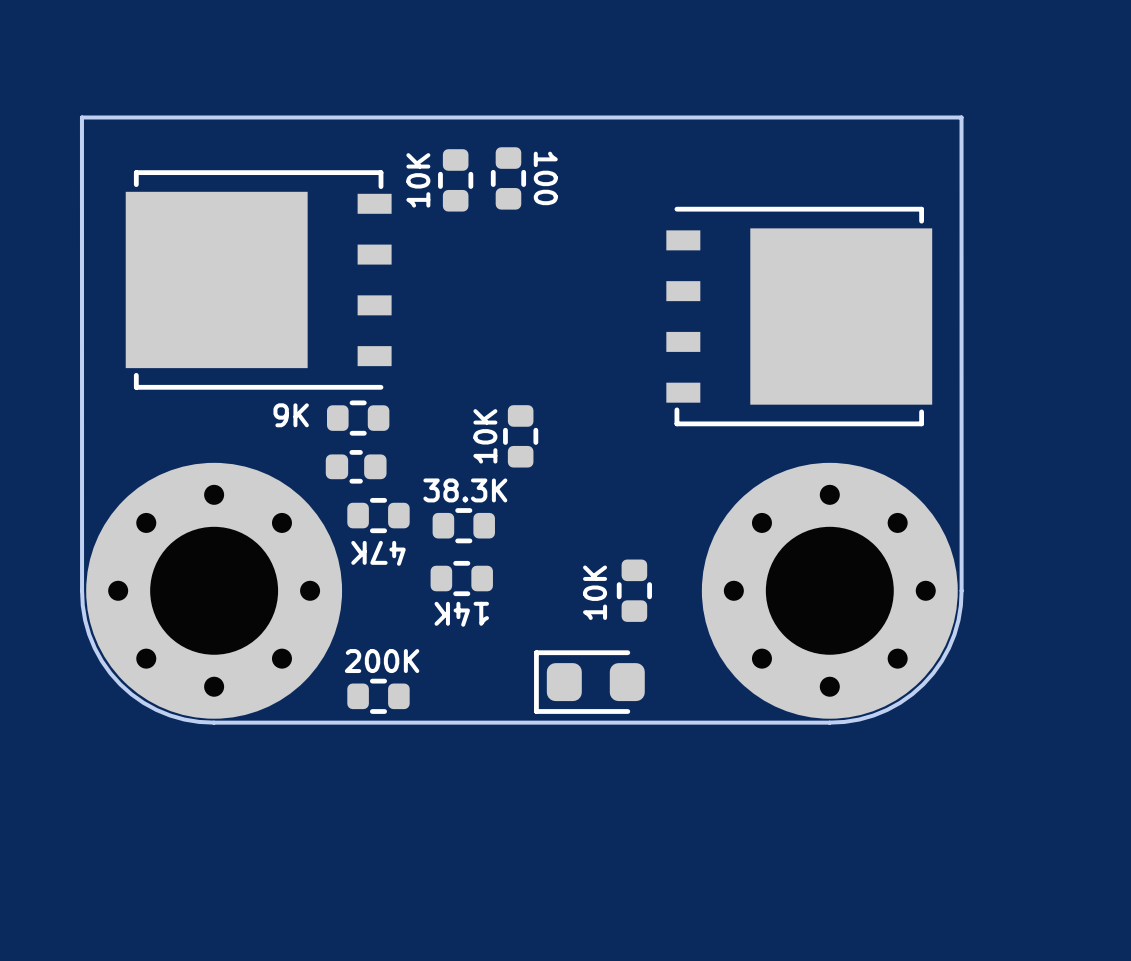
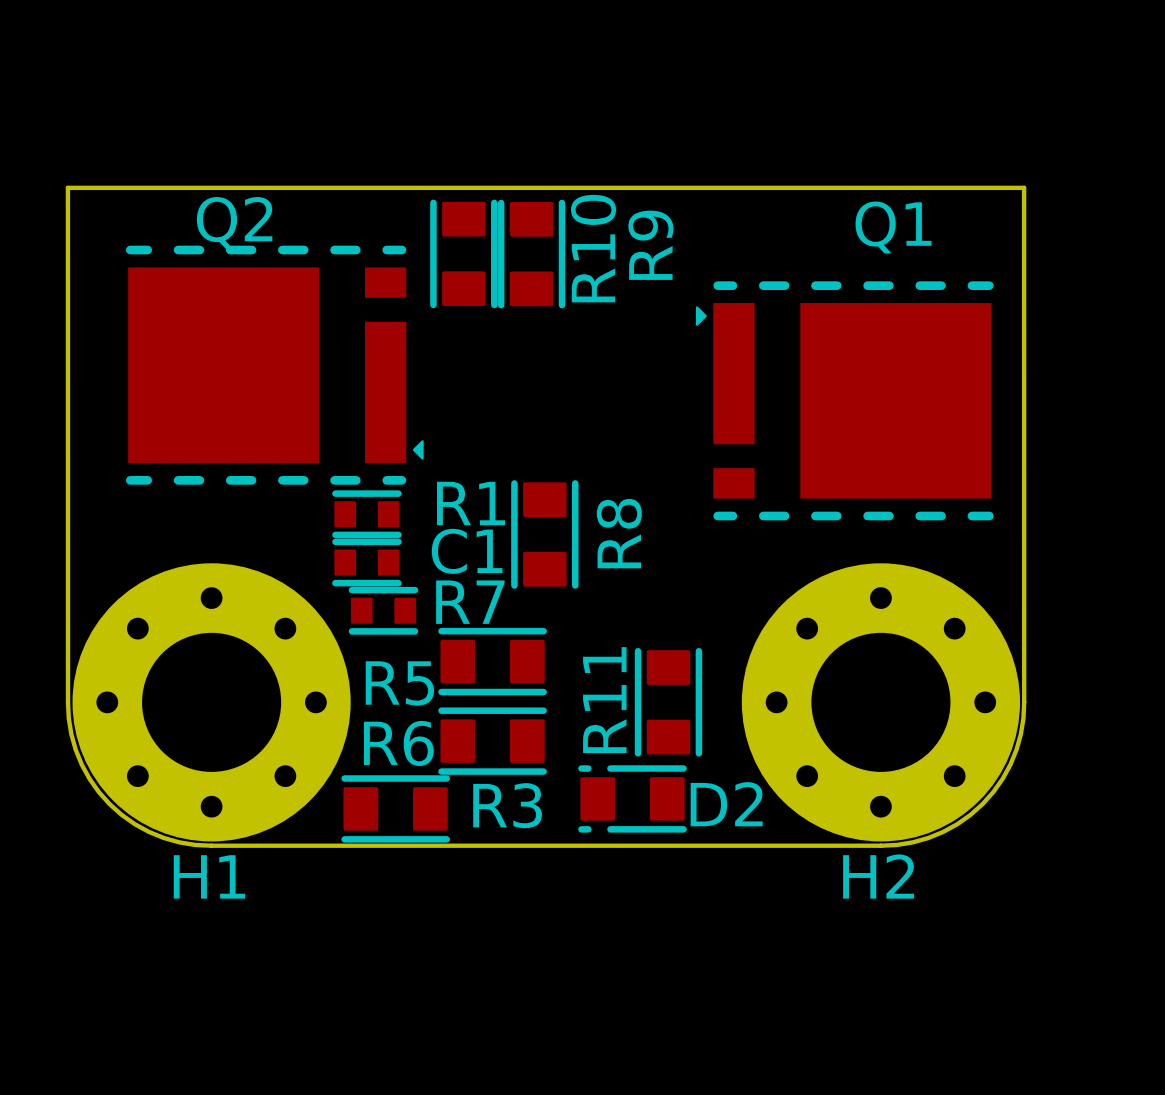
R10: none -> (463, 253)
part: (508, 178) -> none
R9: none -> (531, 254)
part: (455, 180) -> none
part: (258, 279) -> none
Q2: none -> (274, 365)
Q1: none -> (844, 400)
part: (799, 316) -> none
R1: none -> (366, 514)
part: (358, 418) -> none
part: (520, 436) -> none
R8: none -> (544, 534)
C1: none -> (366, 562)
part: (356, 466) -> none
R7: none -> (383, 610)
part: (378, 515) -> none
part: (463, 525) -> none
R5: none -> (492, 661)
part: (461, 578) -> none
part: (634, 590) -> none
R11: none -> (668, 702)
R6: none -> (492, 741)
D2: none -> (632, 798)
part: (589, 682) -> none
R3: none -> (395, 808)
part: (378, 696) -> none
H1 name: none -> H1 (209, 876)
H2 name: none -> H2 (878, 876)

